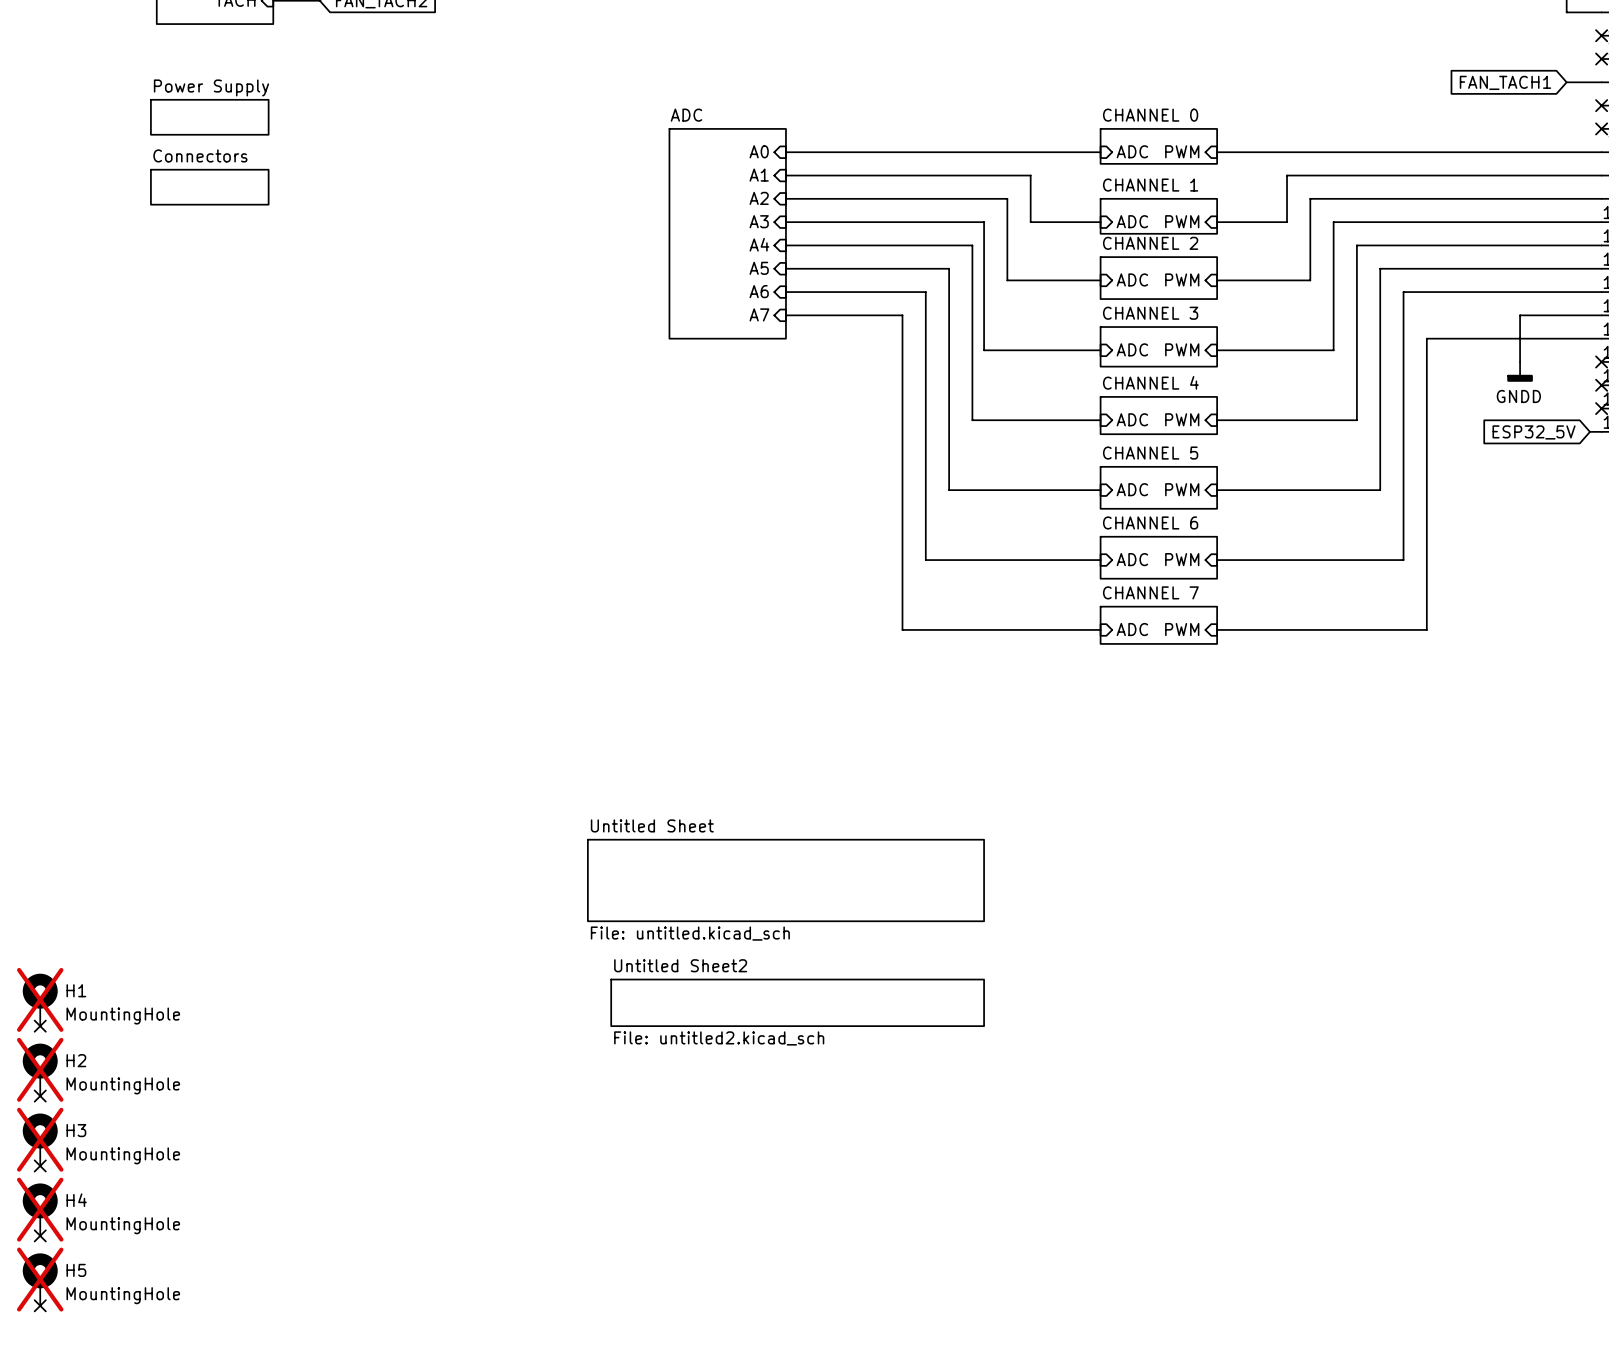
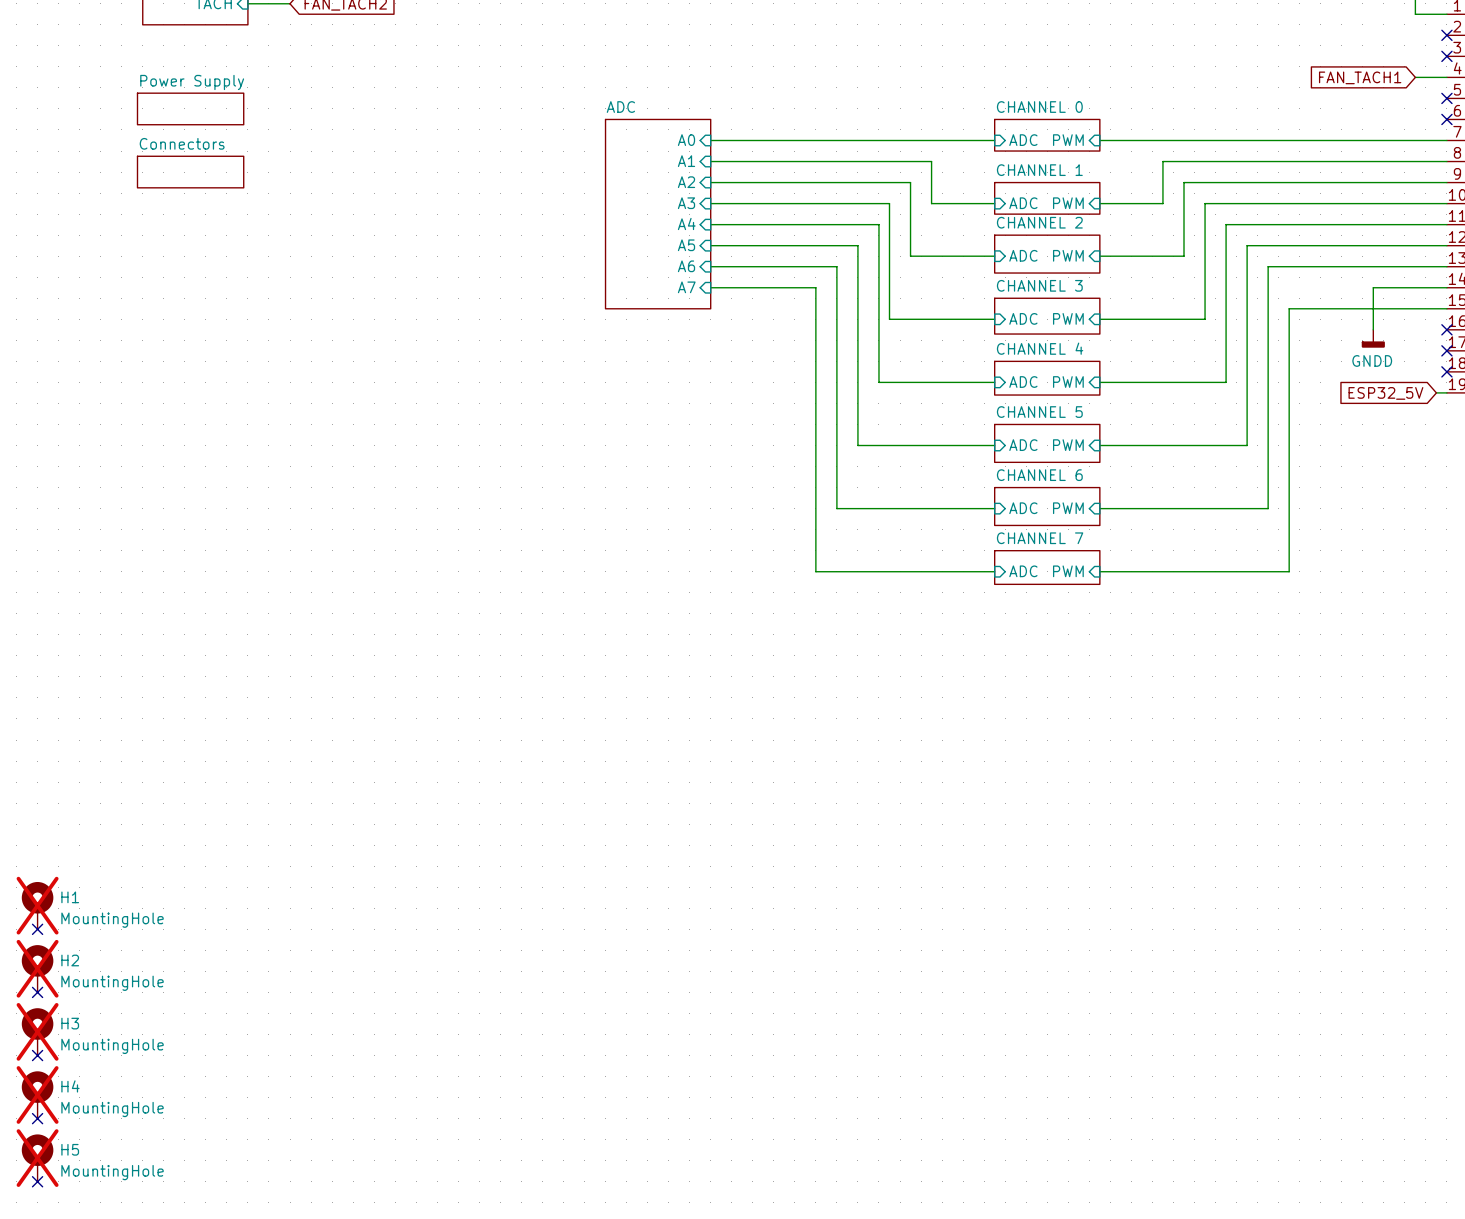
sheet Untitled Sheet: File: untitled.kicad_sch (785, 880) -> none
sheet Untitled Sheet2: File: untitled2.kicad_sch (797, 1002) -> none

